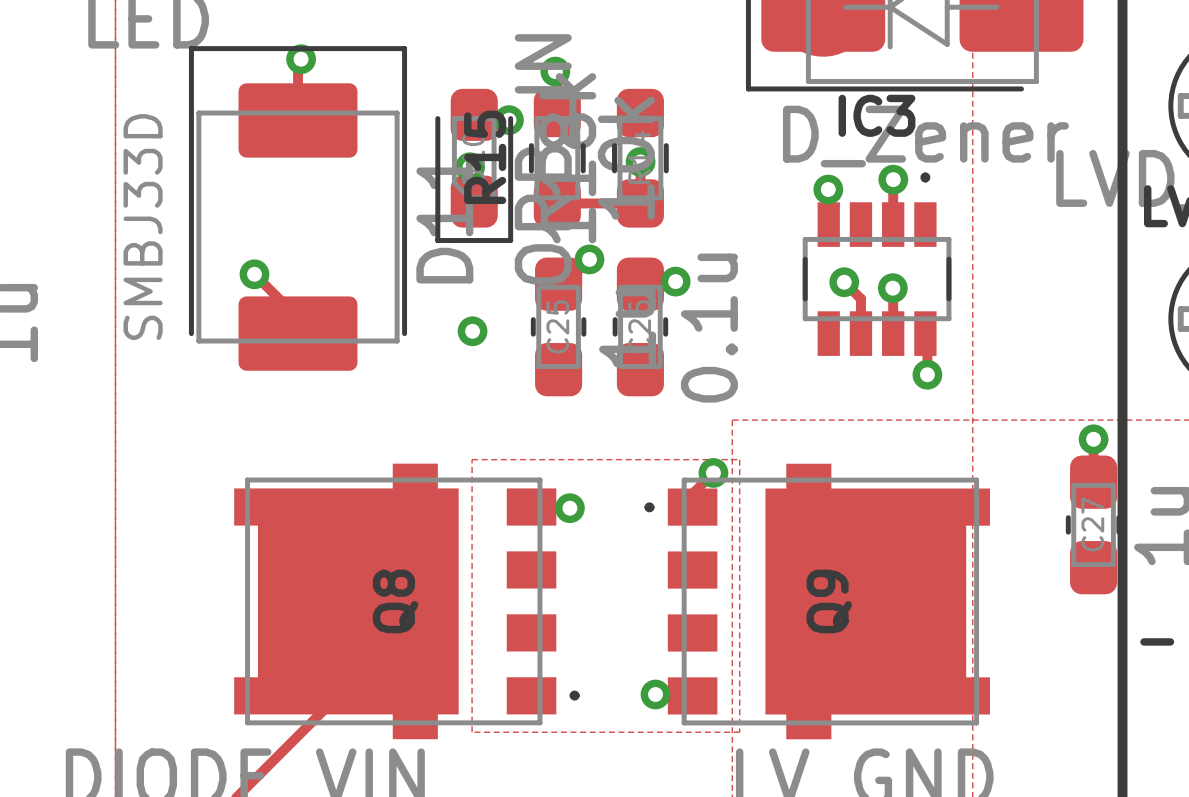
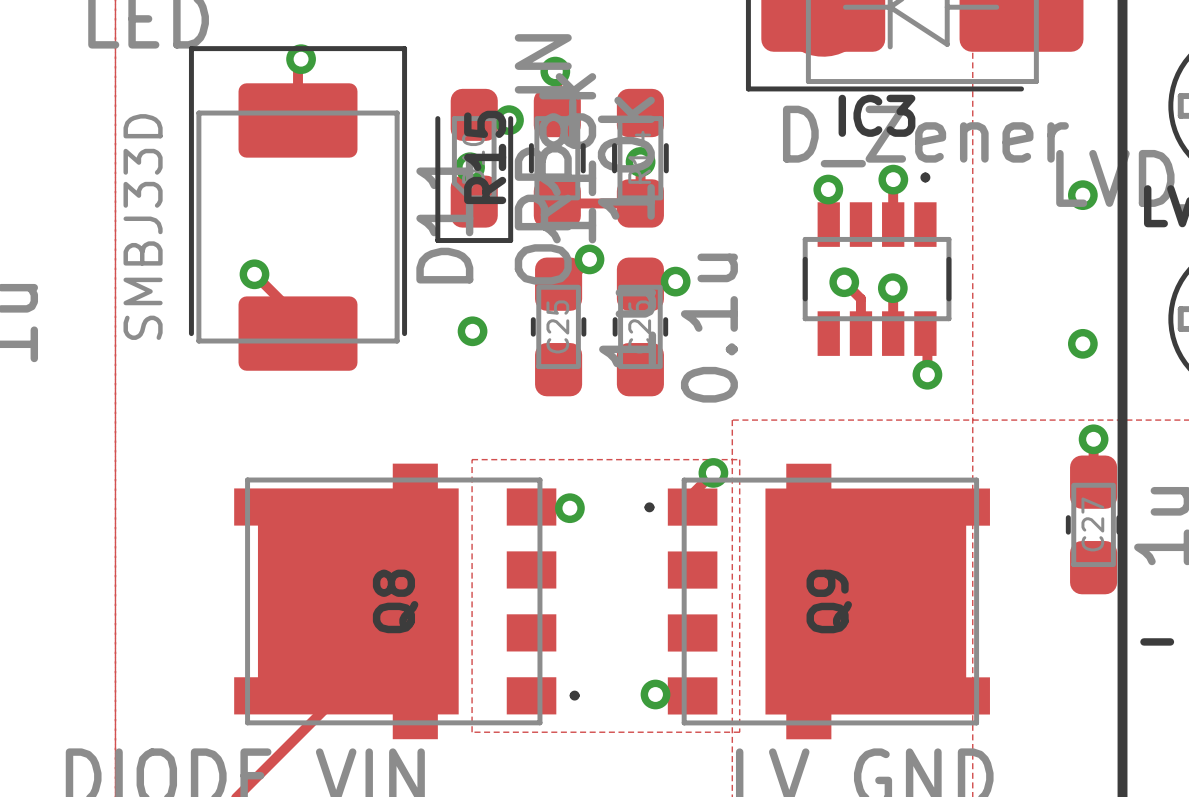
via: none -> (1082, 195)
via: none -> (1082, 343)

